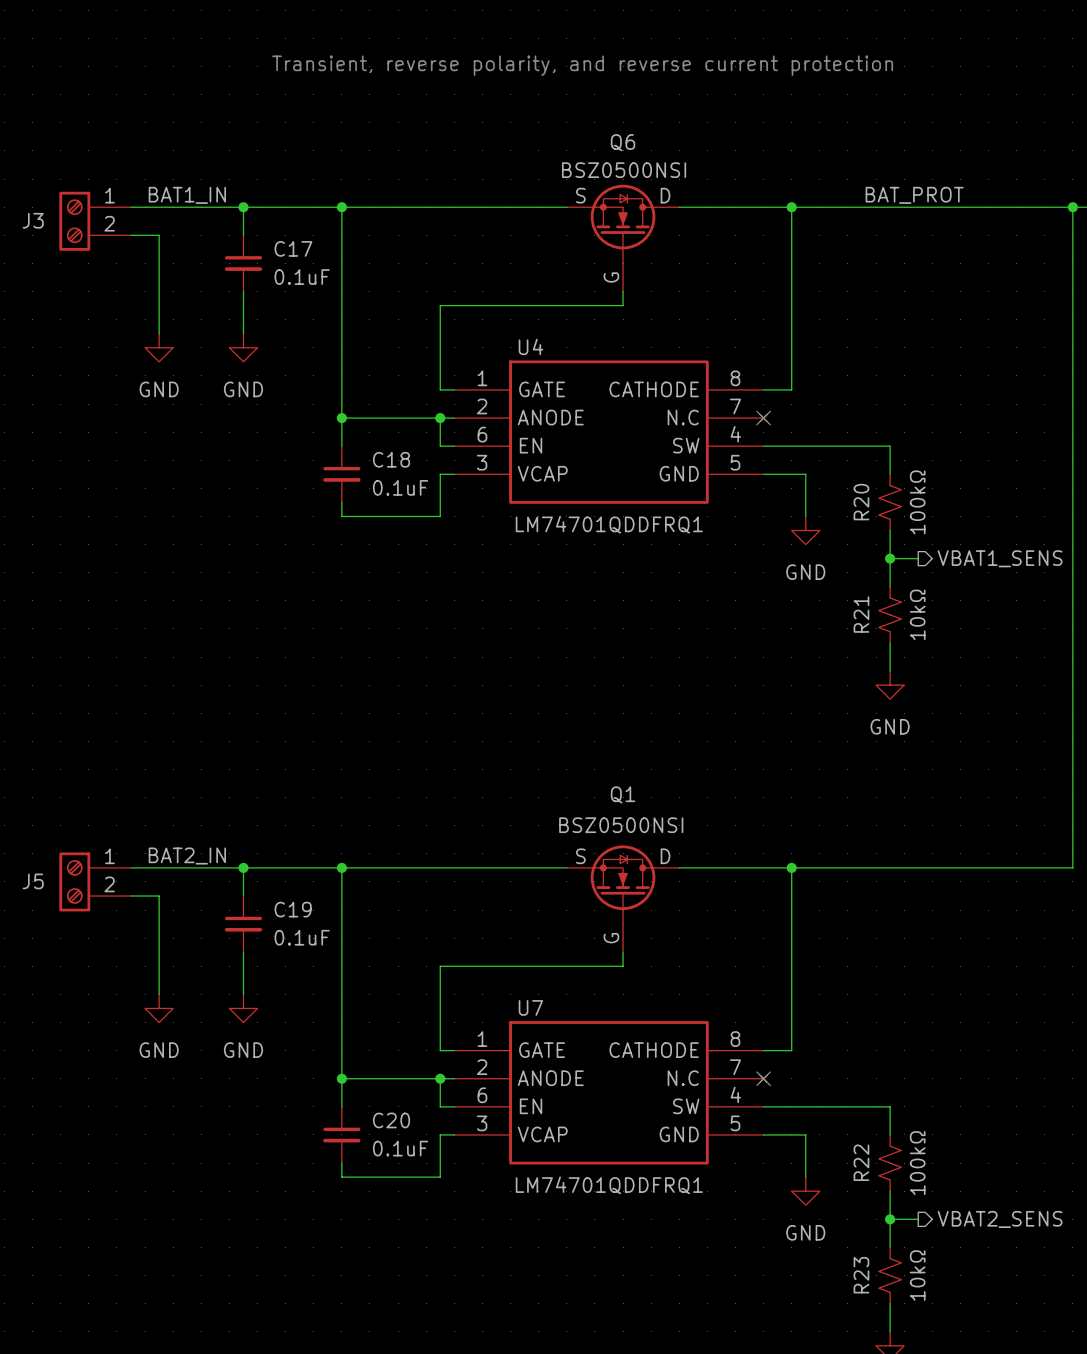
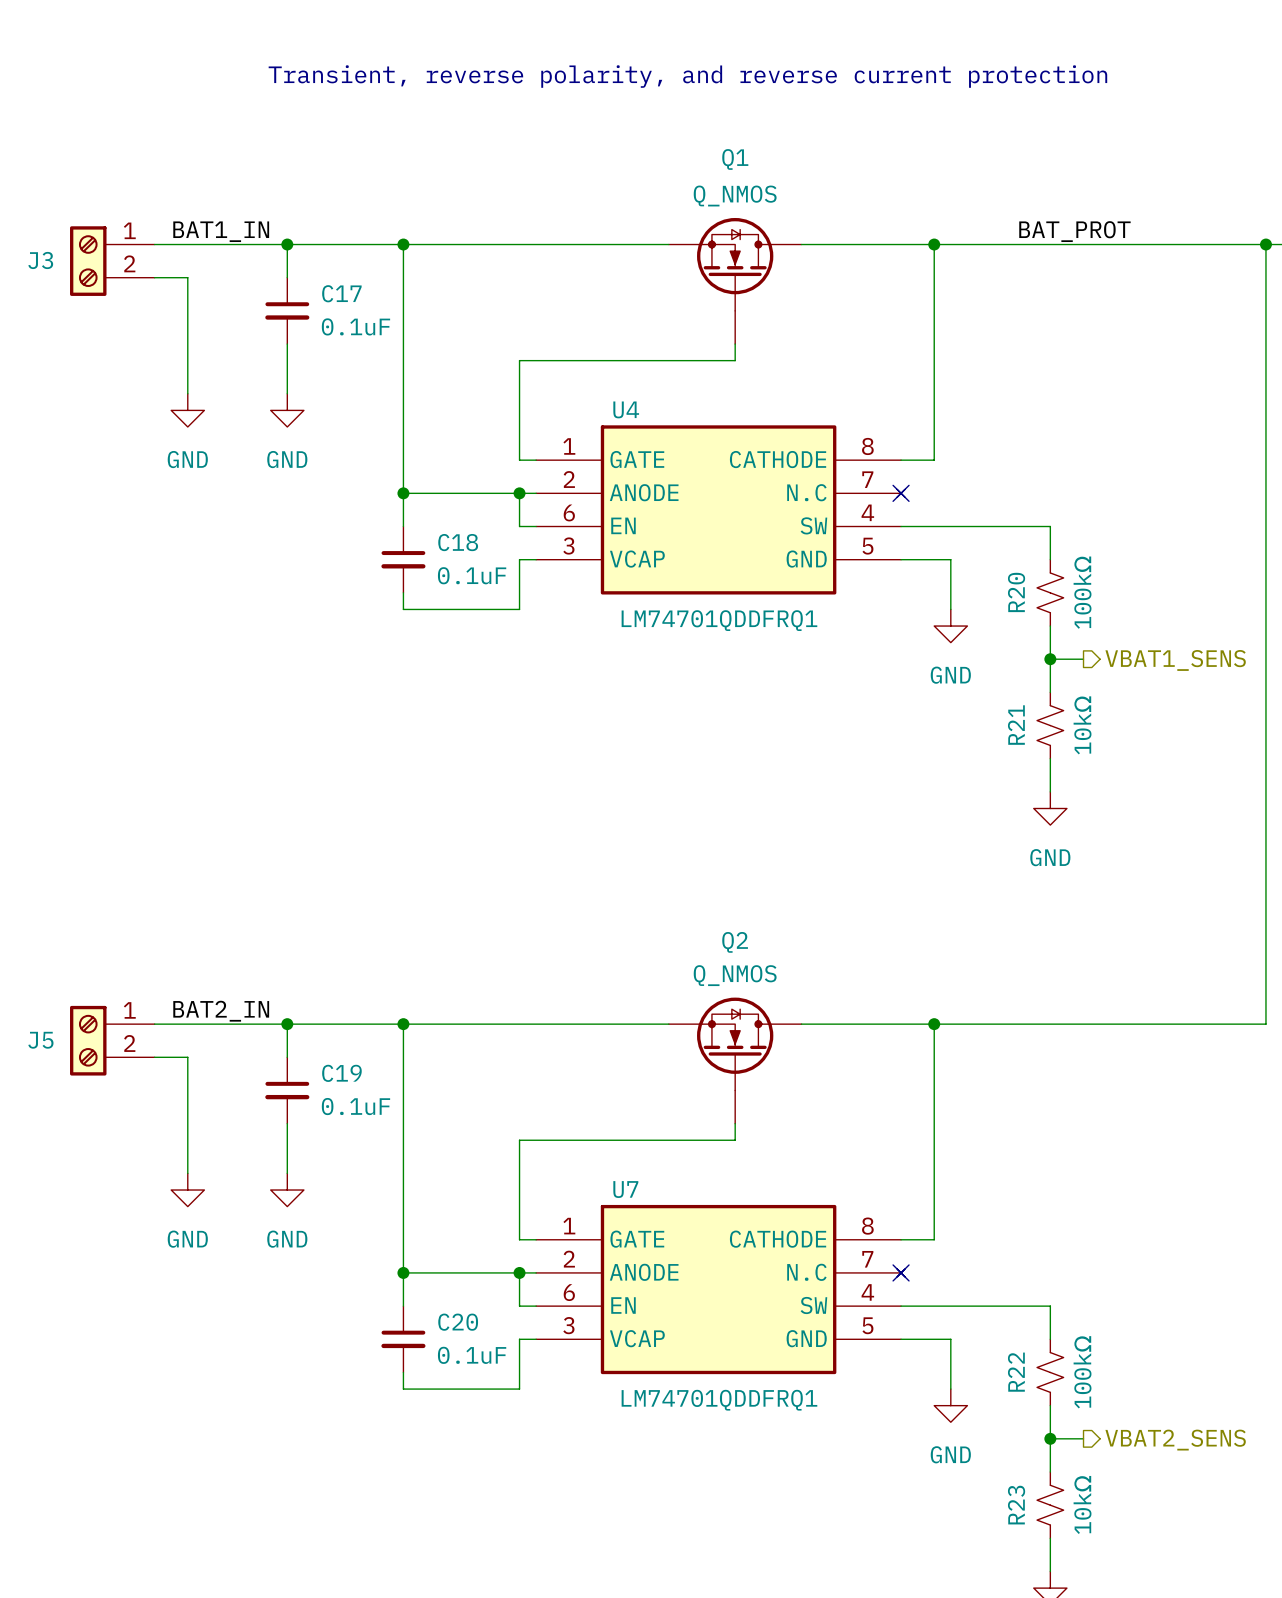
Q6: BSZ0500NSI (623, 238) -> none
Q1 value: BSZ0500NSI (621, 825) -> Q_NMOS (735, 196)
Q1 pin number: S (580, 856) -> none
Q1 pin number: D (665, 856) -> none
Q1 position: (623, 898) -> (735, 281)
Q2: none -> Q_NMOS (735, 1060)
Q1 pin number: G (611, 938) -> none

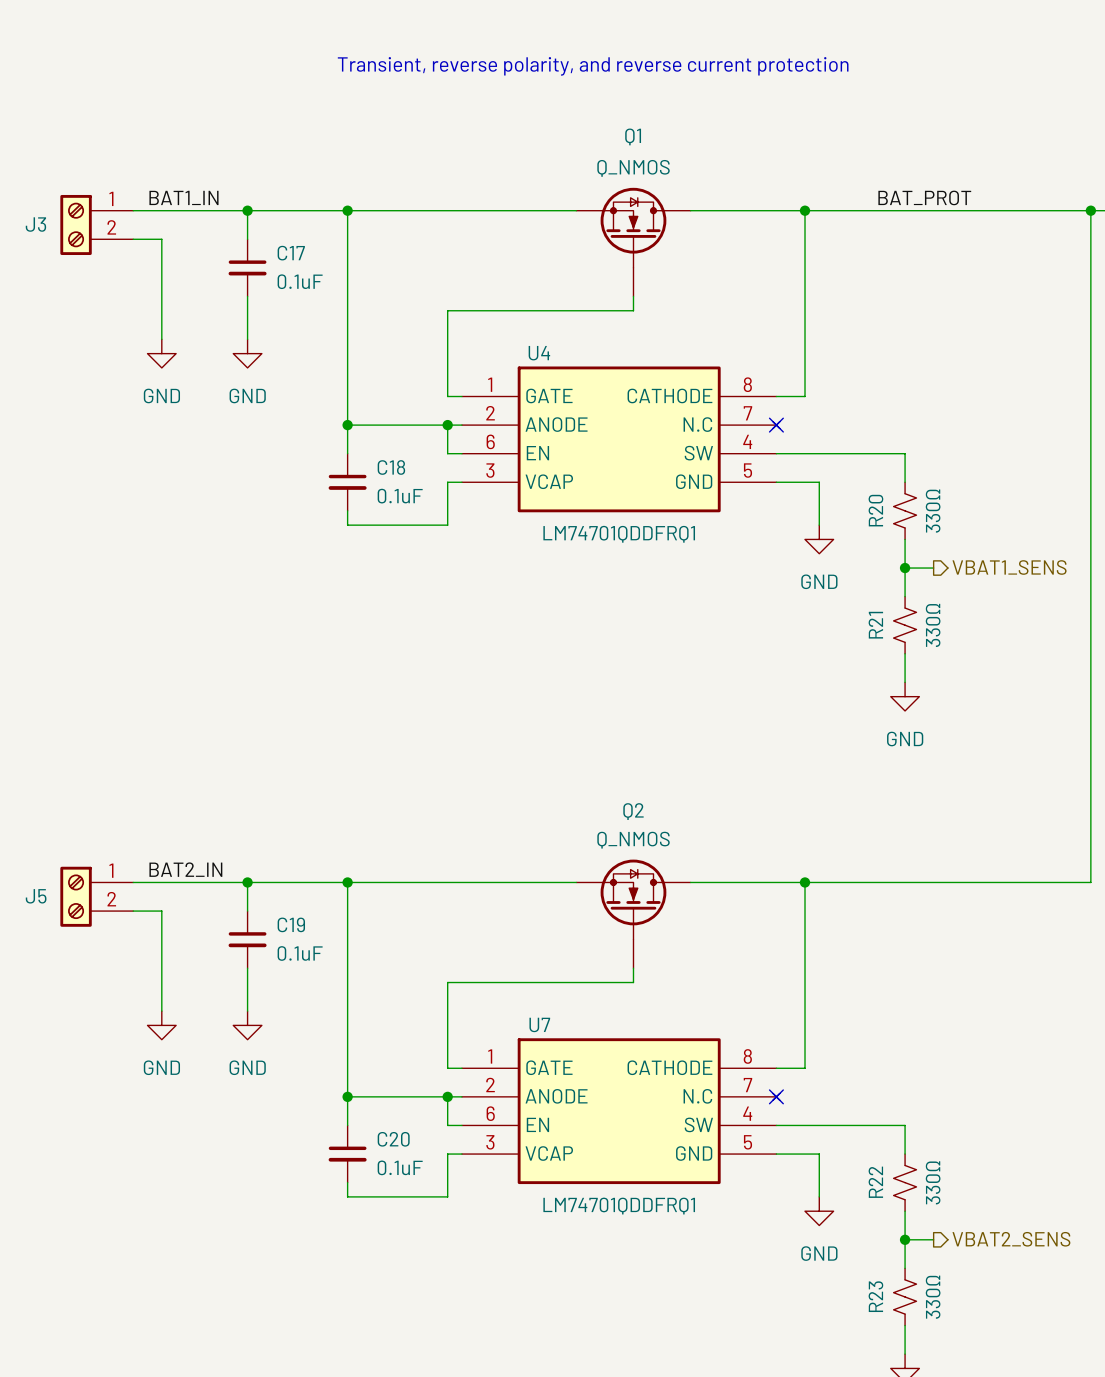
R20 value: 100kΩ (1082, 592) -> 330Ω (933, 511)
R21 value: 10kΩ (1082, 725) -> 330Ω (933, 625)
R22 value: 100kΩ (1082, 1372) -> 330Ω (933, 1182)
R23 value: 10kΩ (1082, 1504) -> 330Ω (933, 1297)

